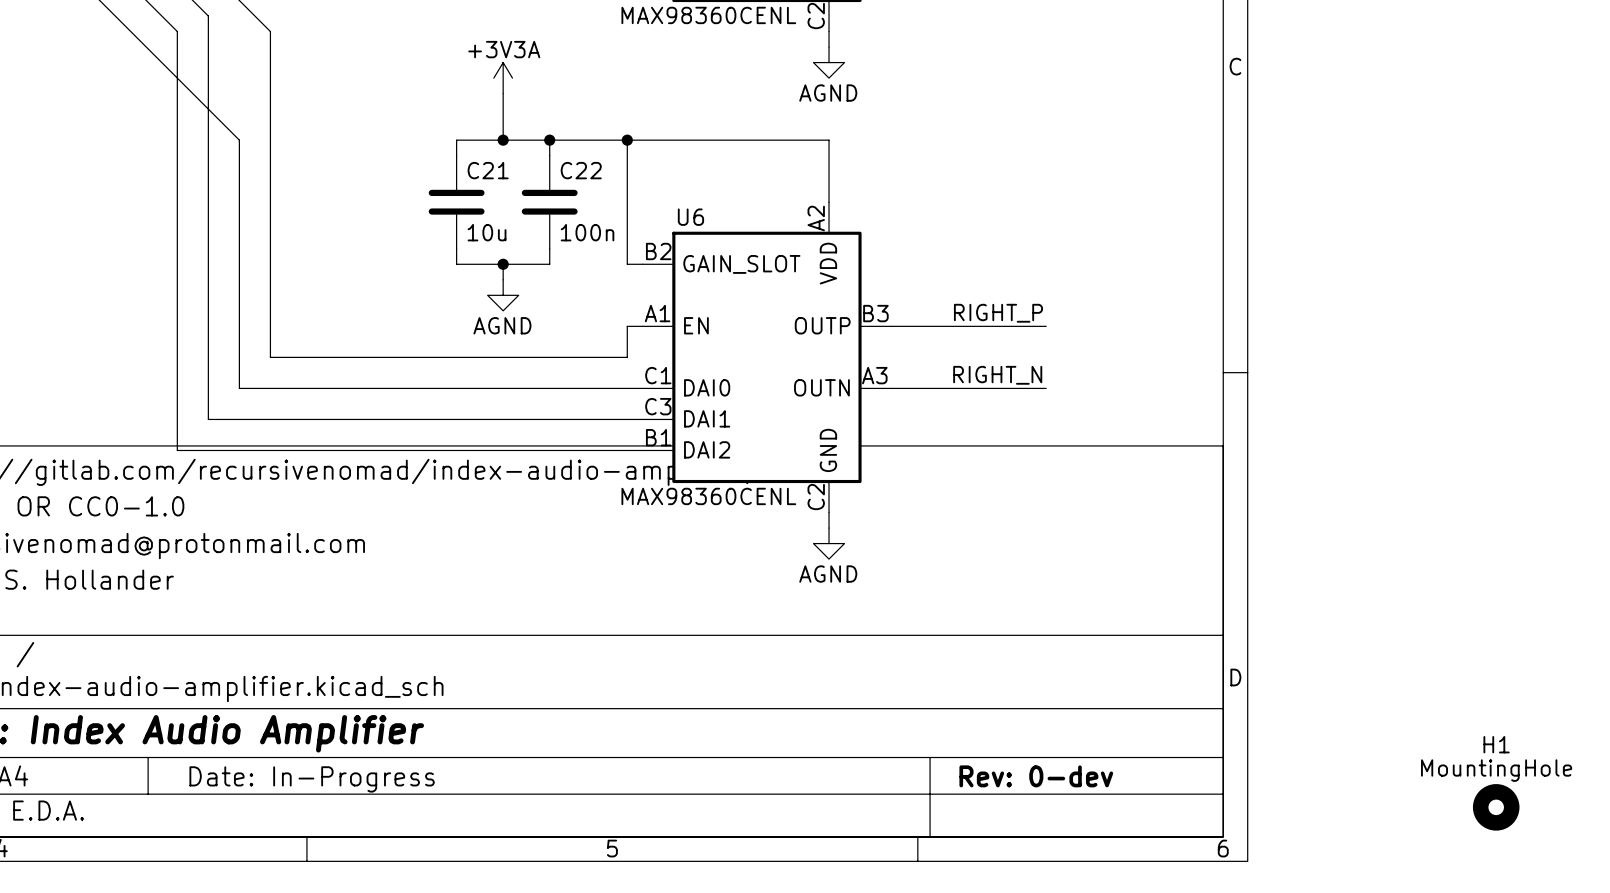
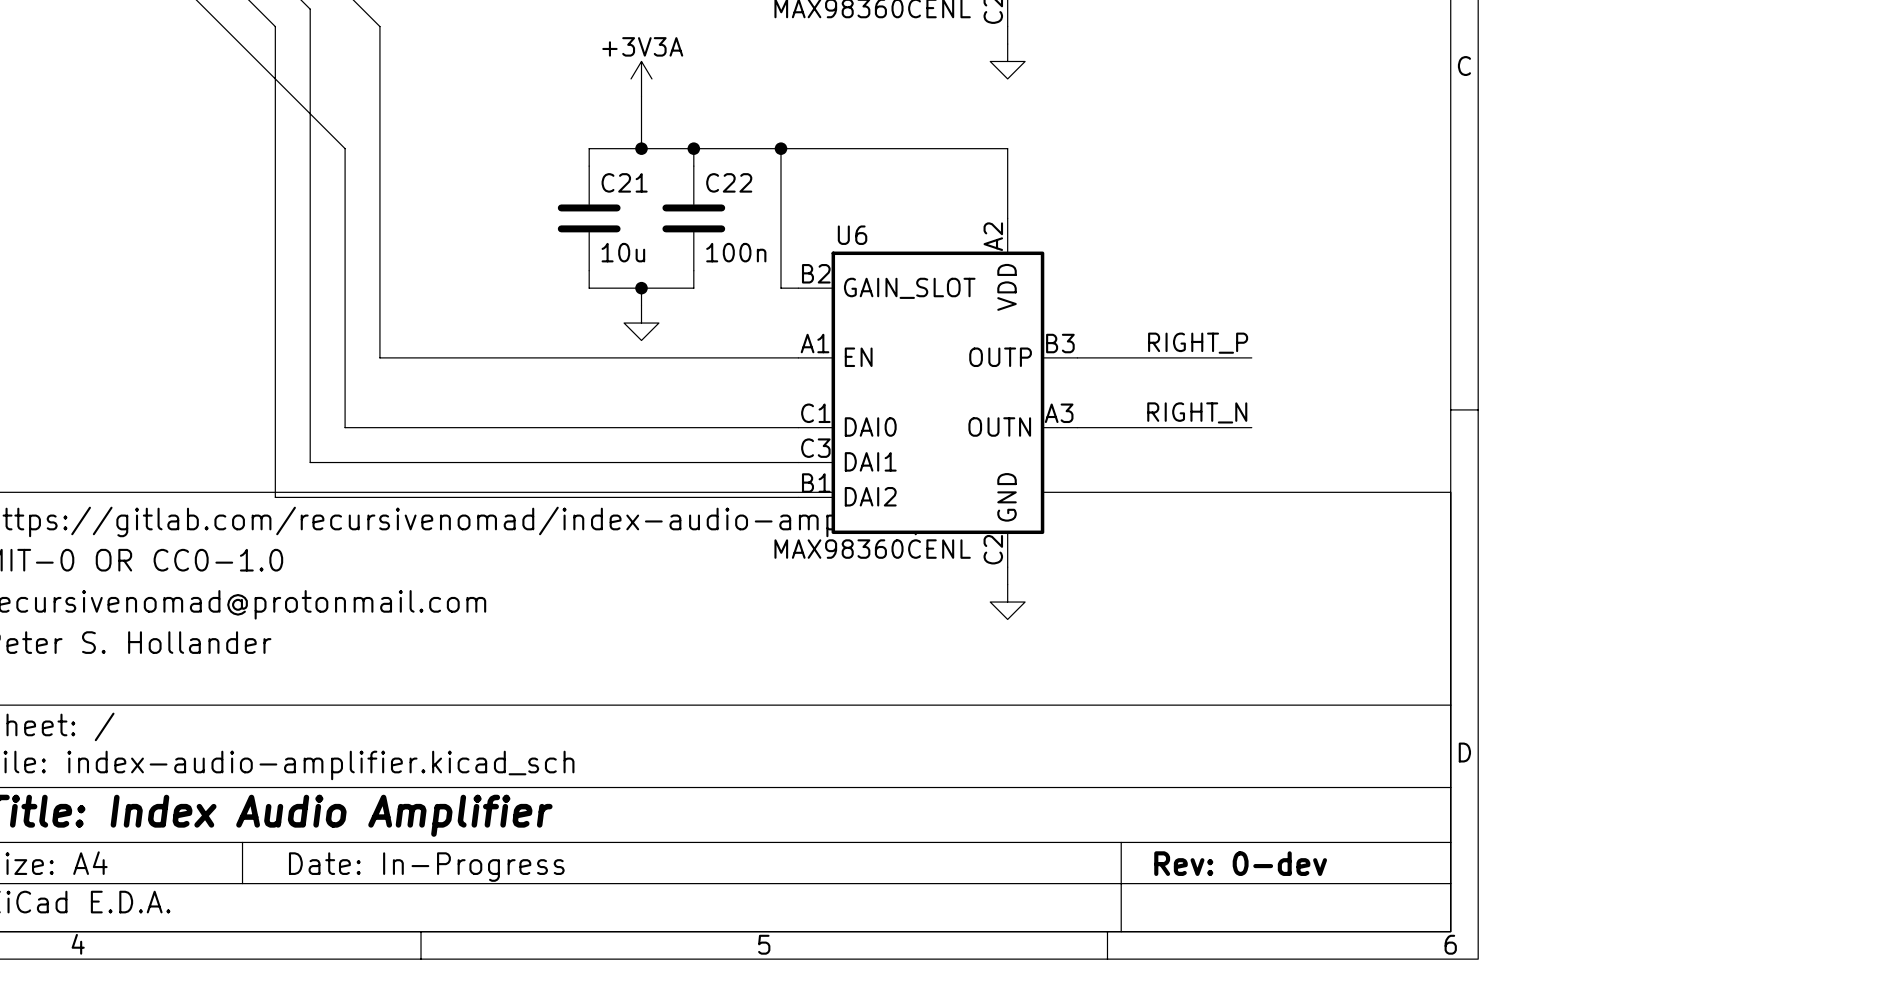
power symbol text: AGND (828, 93) -> none
power symbol text: AGND (502, 325) -> none
wire: (270, 326) (270, 357) (627, 357) (627, 326) -> (379, 357) (780, 357)
power symbol text: AGND (828, 574) -> none
H1: MountingHole (1496, 807) -> none

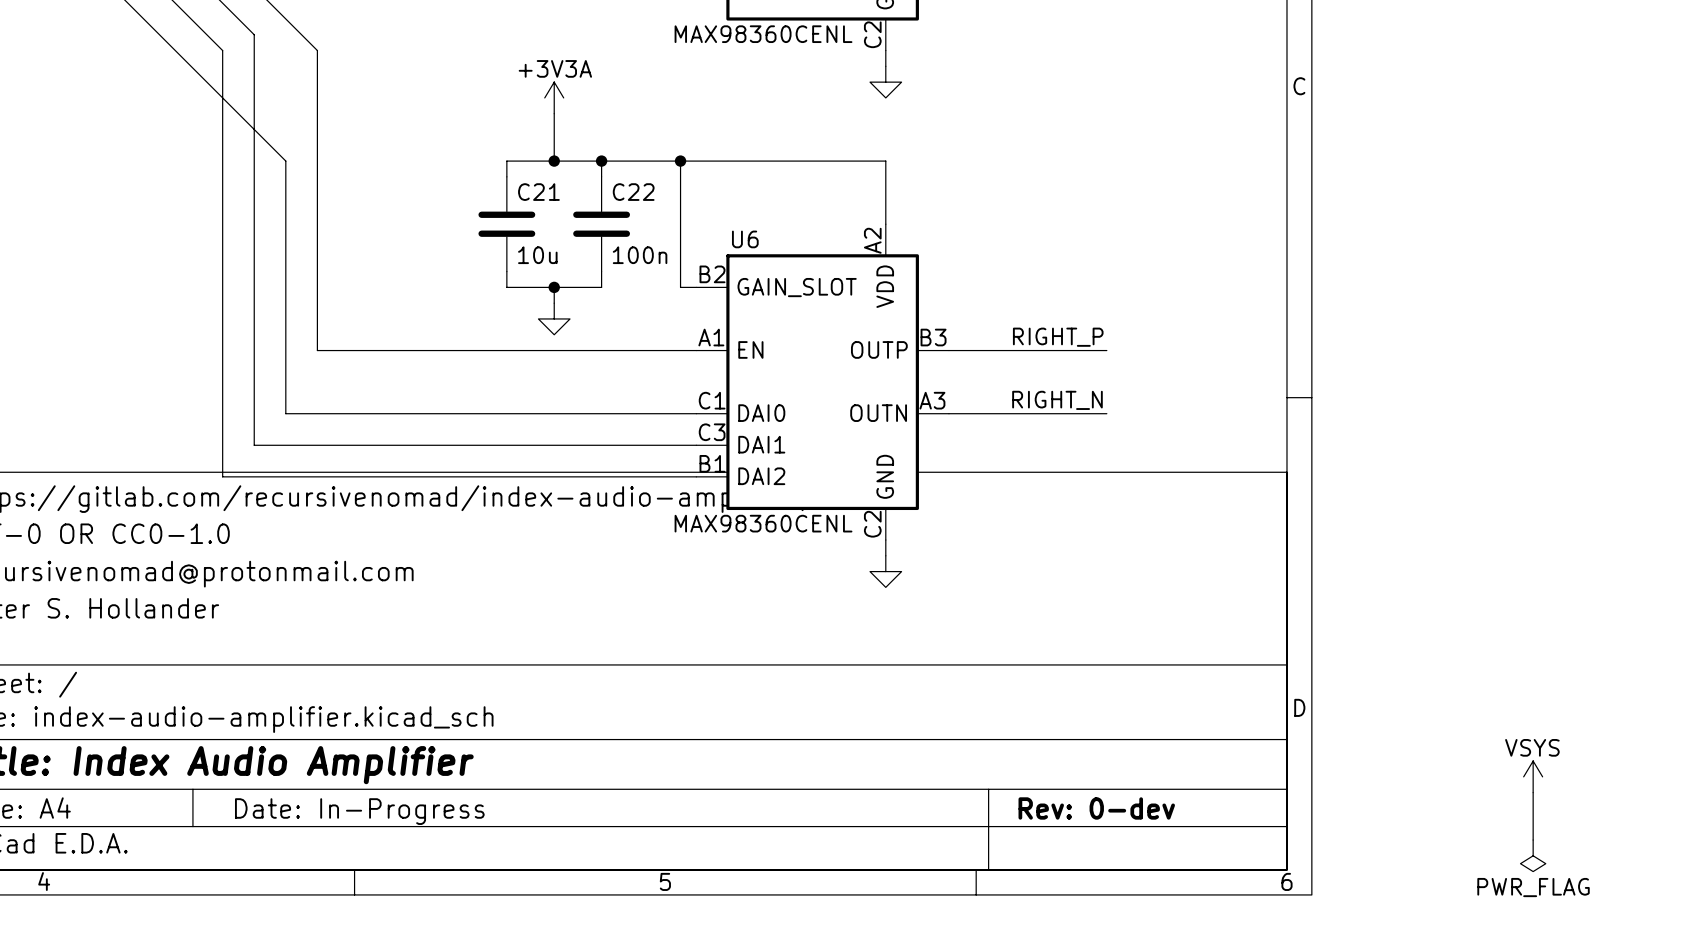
power symbol: none -> VSYS (1533, 776)
wire: none -> (1533, 792) (1533, 840)
power symbol: none -> PWR_FLAG (1533, 855)

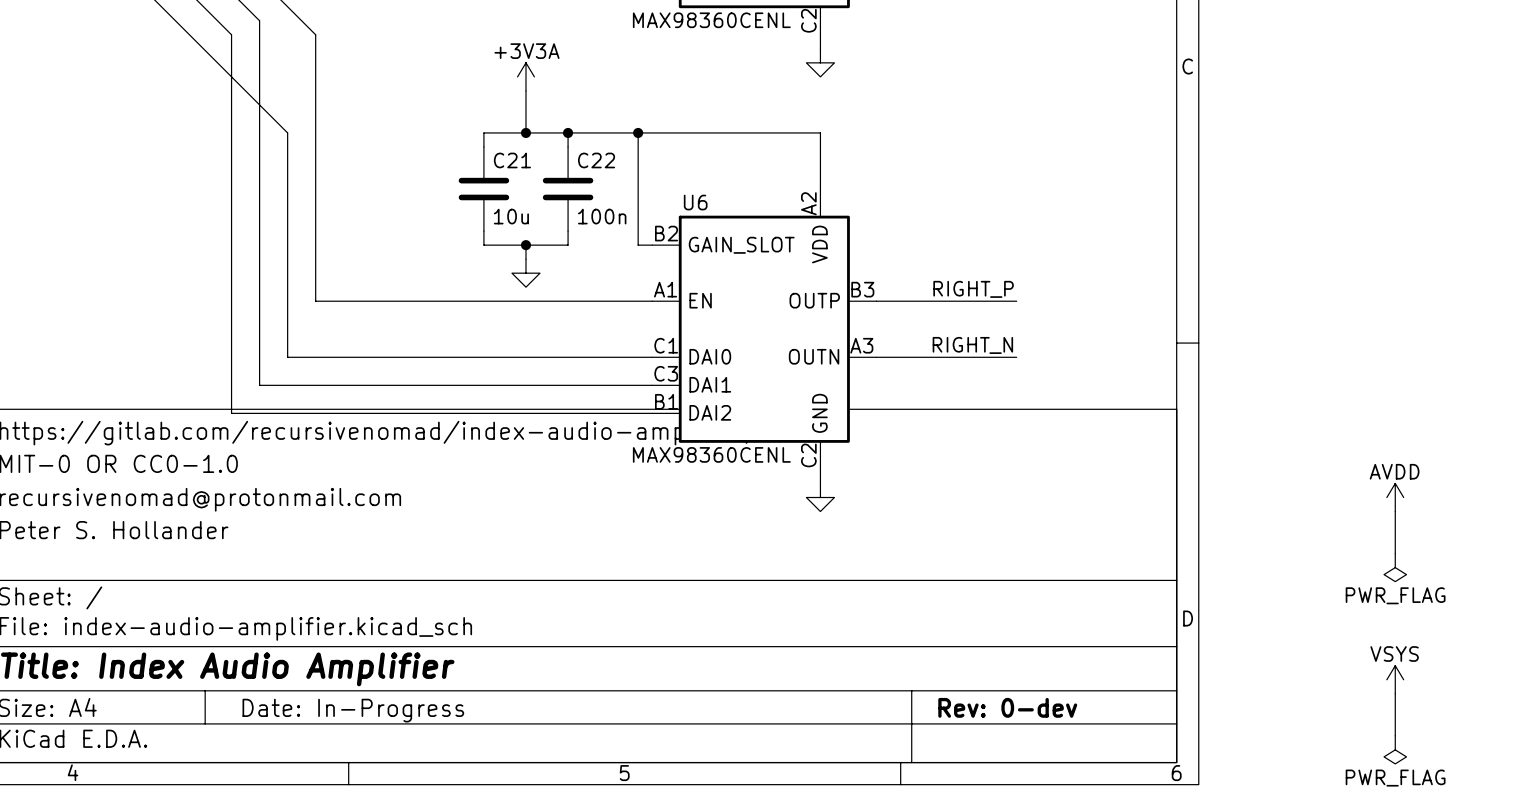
power symbol: none -> AVDD (1395, 497)
wire: none -> (1395, 511) (1395, 553)
power symbol: none -> PWR_FLAG (1395, 567)

